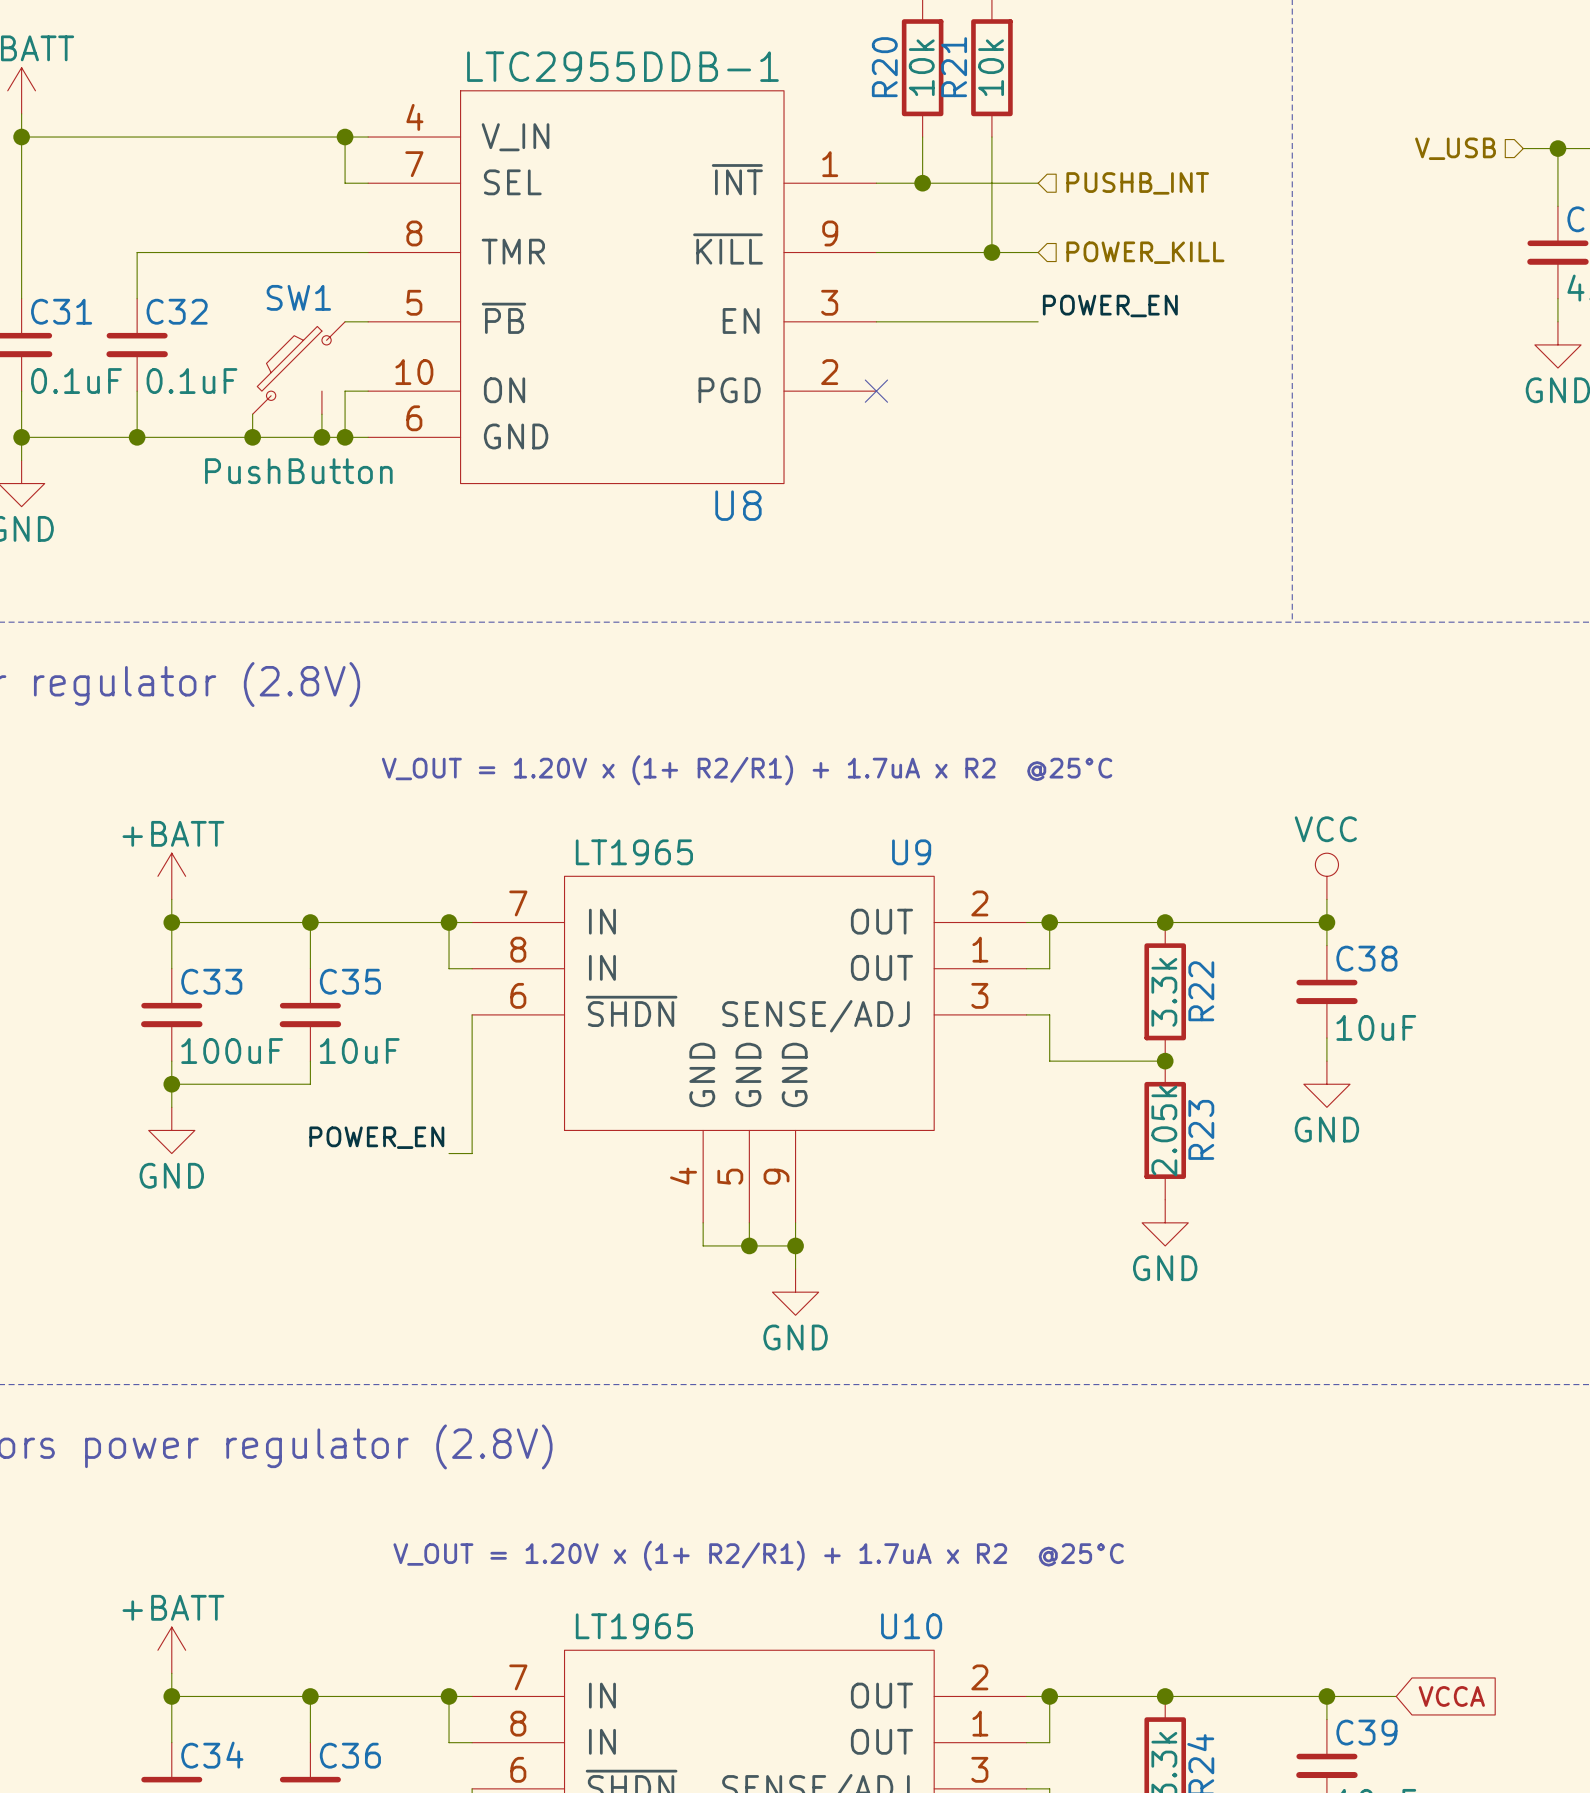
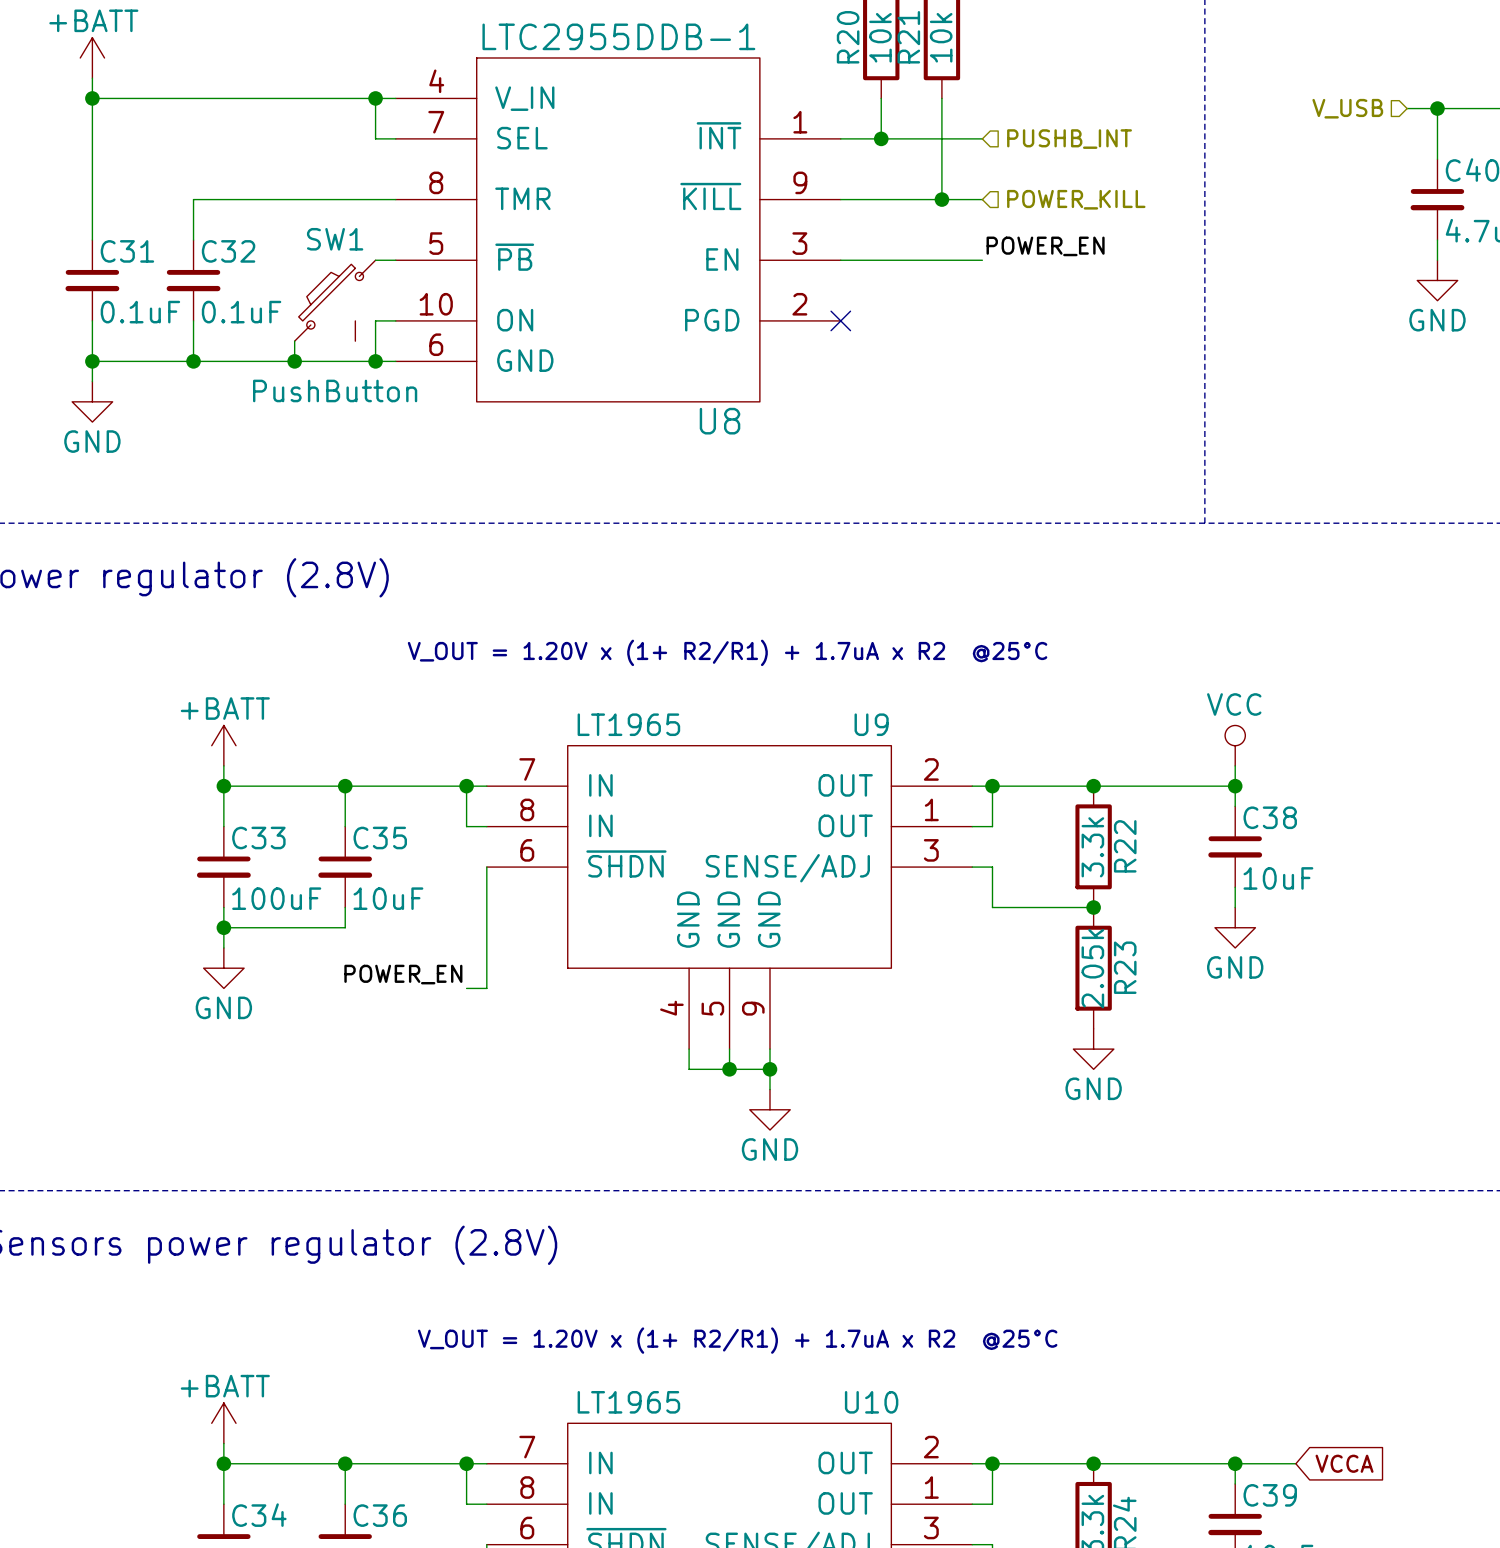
wire: (321, 414) (321, 437) -> none
junction: (321, 437) -> none

